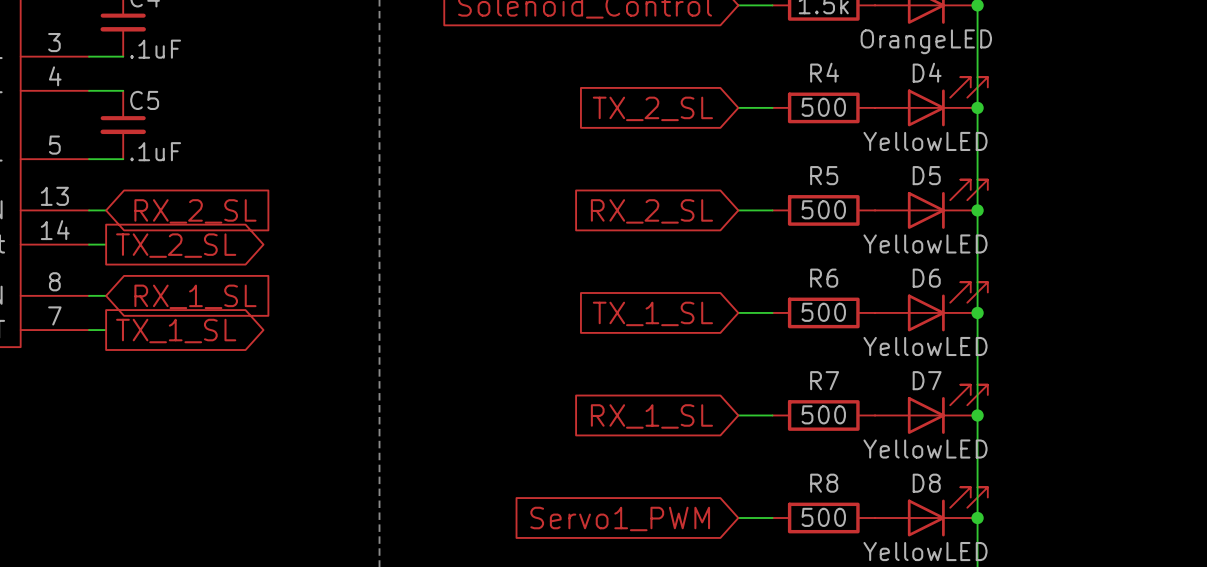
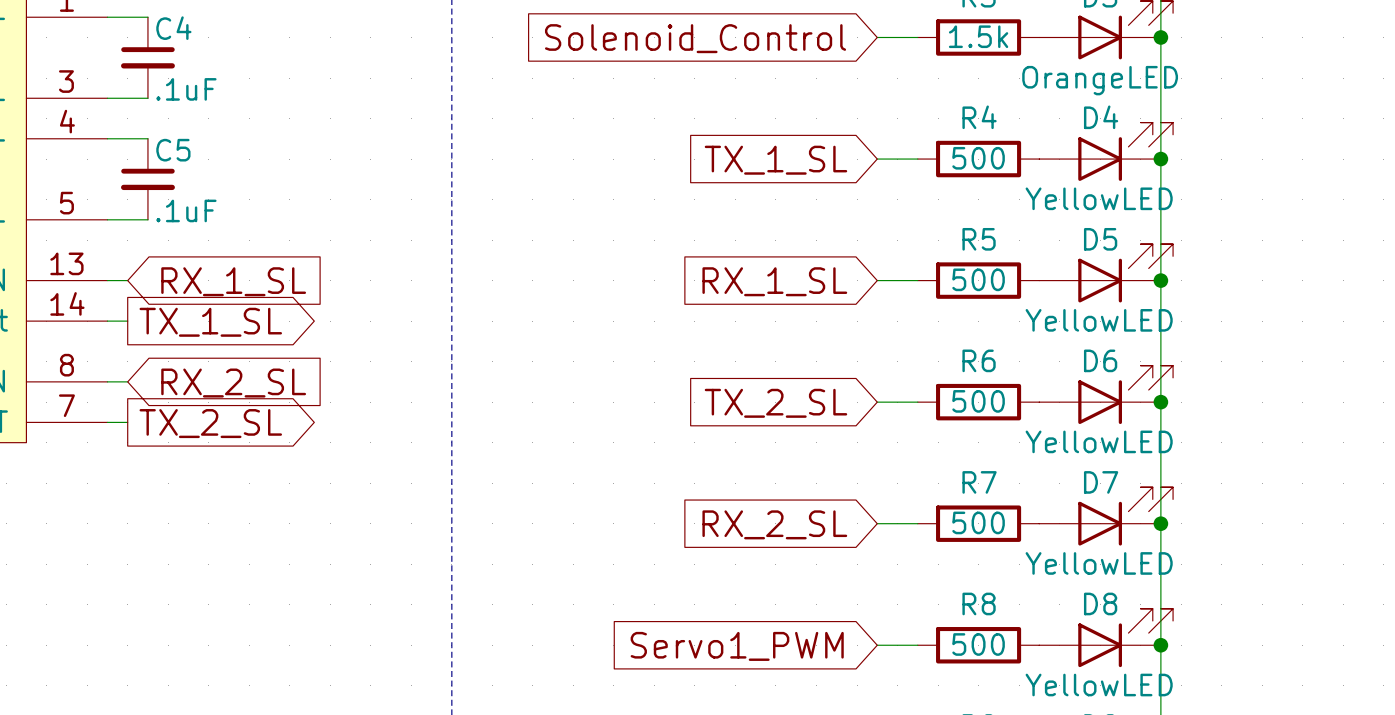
global label: TX_2_SL (652, 108) -> TX_1_SL (775, 160)
global label: RX_2_SL (195, 211) -> RX_1_SL (233, 281)
global label: RX_2_SL (651, 211) -> RX_1_SL (774, 281)
global label: TX_2_SL (176, 245) -> TX_1_SL (210, 322)
global label: RX_1_SL (195, 296) -> RX_2_SL (233, 383)
global label: TX_1_SL (652, 313) -> TX_2_SL (775, 403)
global label: TX_1_SL (176, 331) -> TX_2_SL (210, 423)
global label: RX_1_SL (651, 416) -> RX_2_SL (774, 524)

